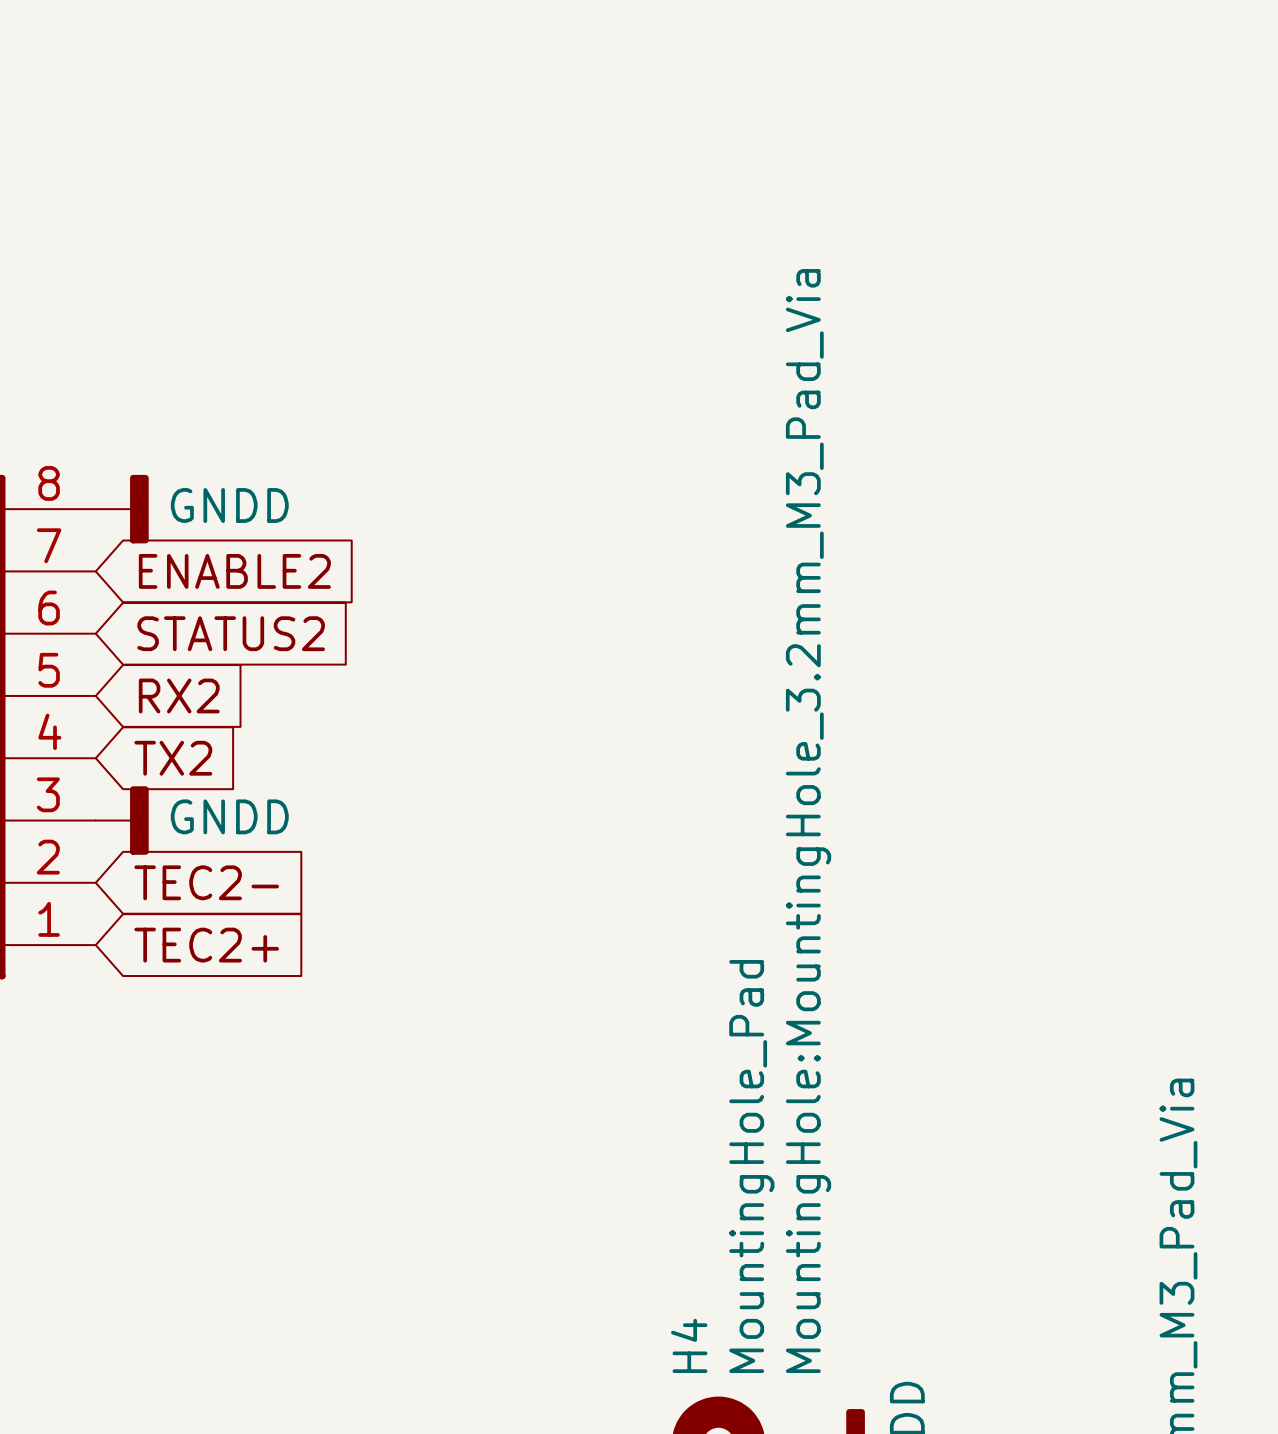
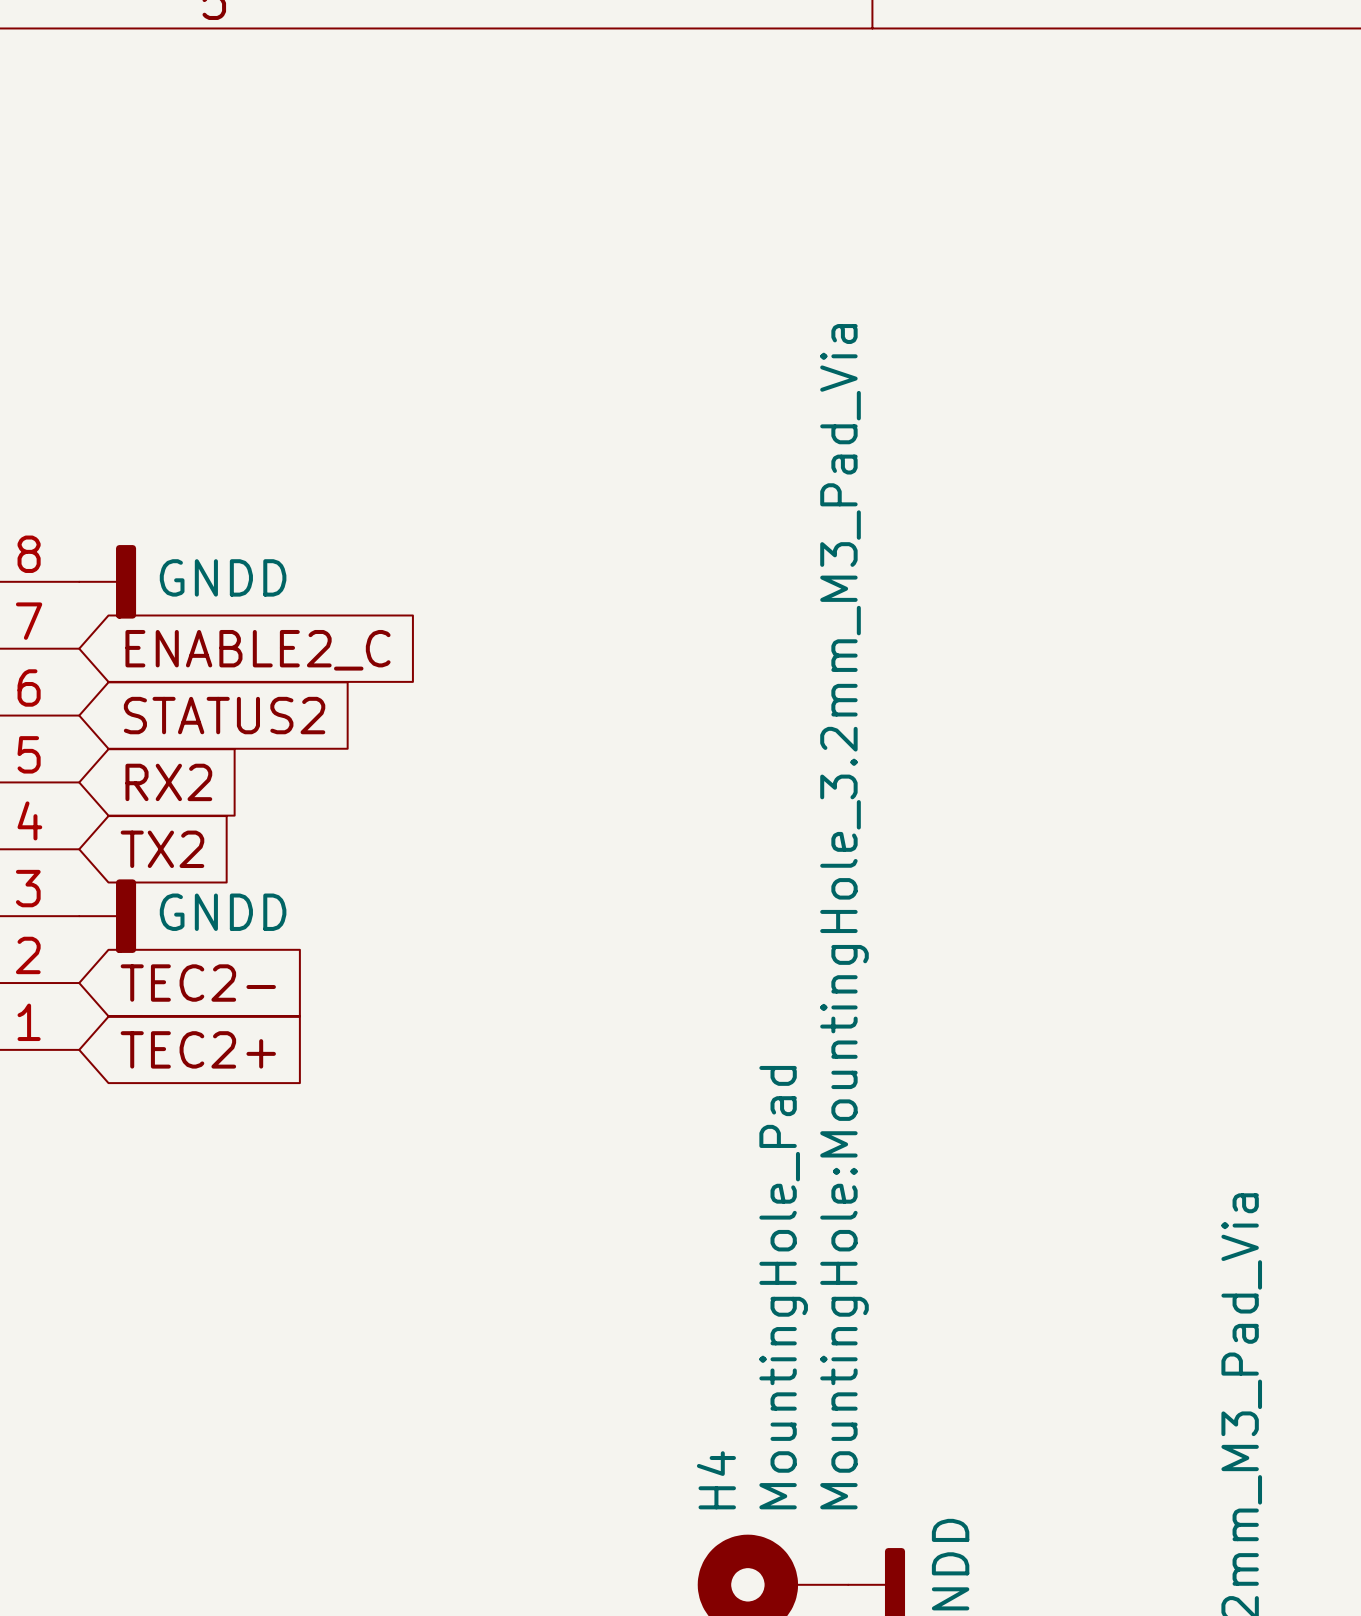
global label: ENABLE2 (234, 571) -> ENABLE2_C (257, 650)

